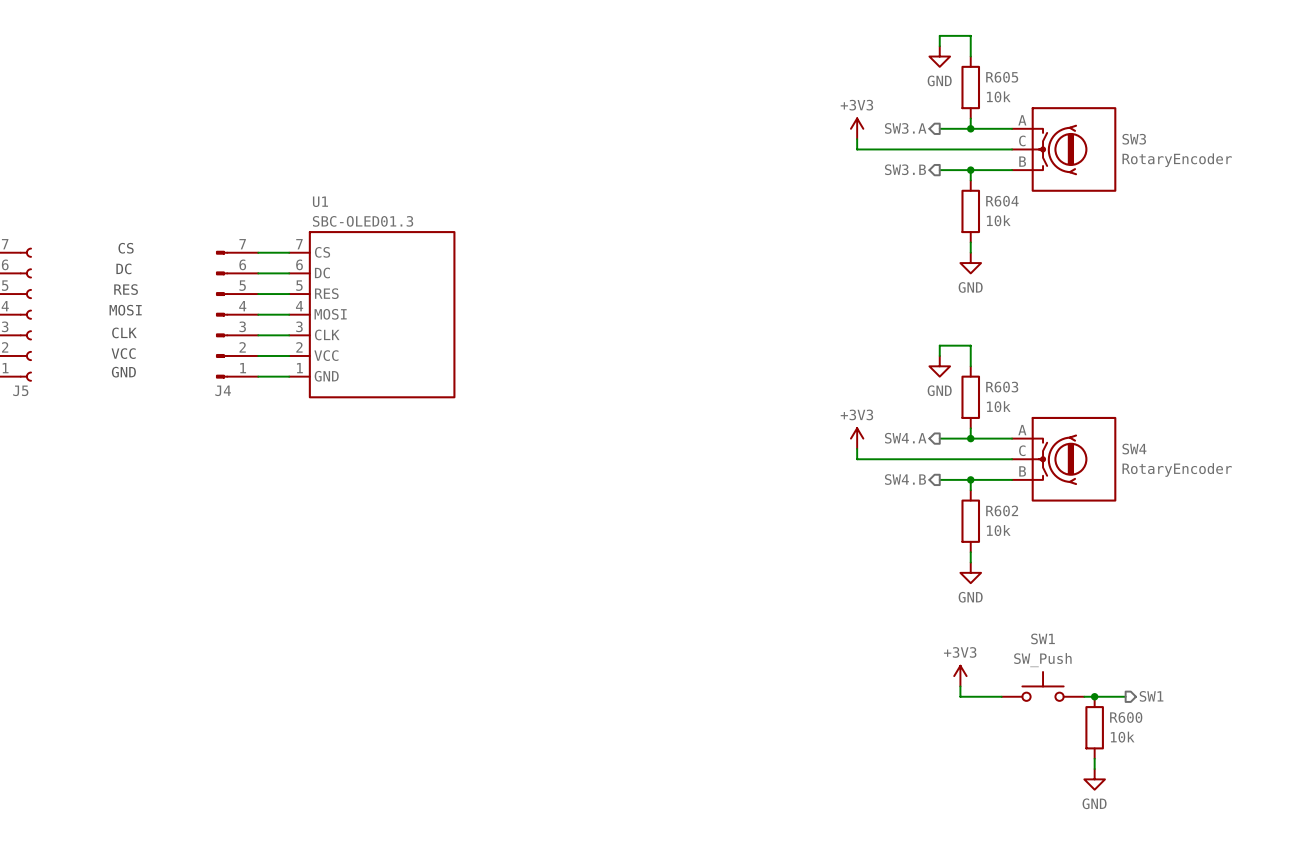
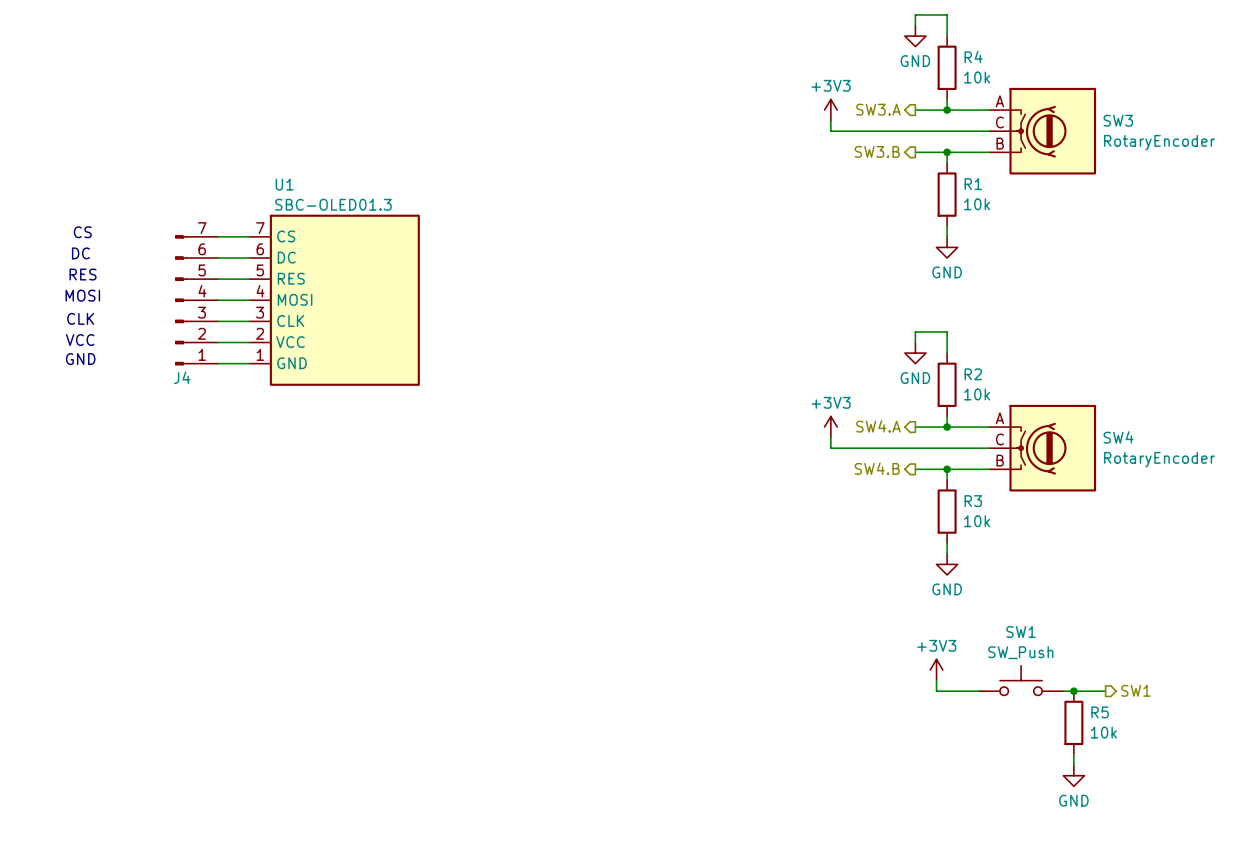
R605 name: R605 (1002, 77) -> R4 (973, 57)
R604 name: R604 (1002, 201) -> R1 (973, 184)
R603 name: R603 (1002, 387) -> R2 (973, 374)
R602 name: R602 (1002, 510) -> R3 (973, 501)
R600 name: R600 (1126, 717) -> R5 (1100, 712)

